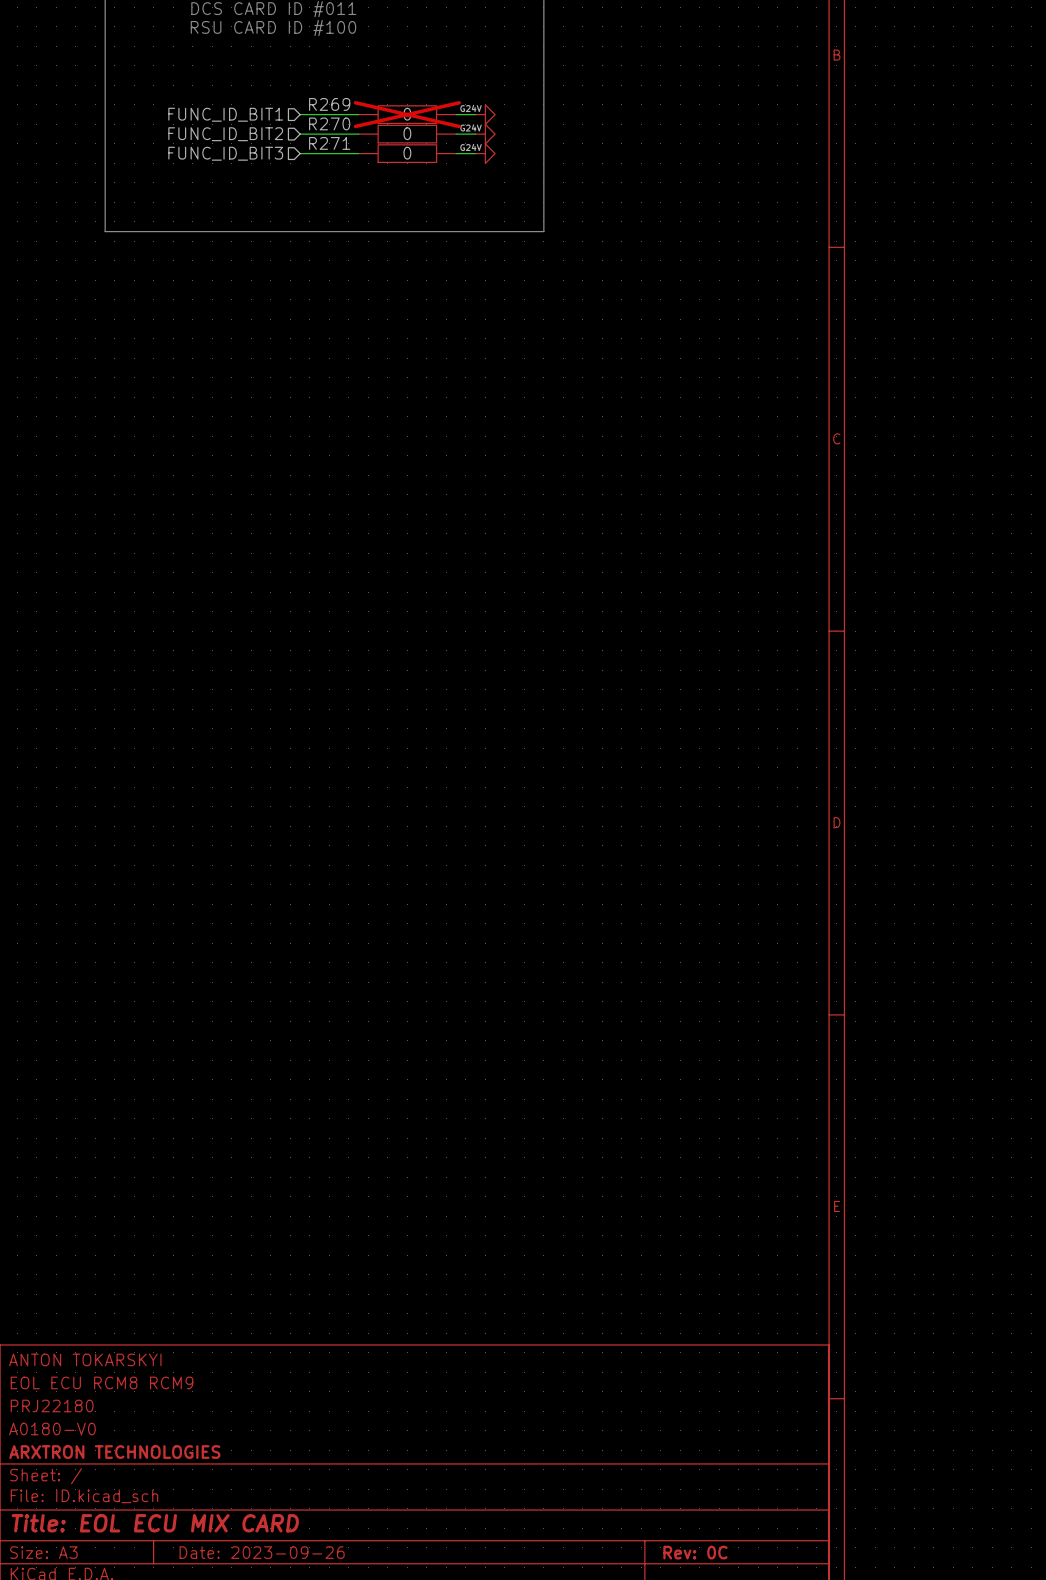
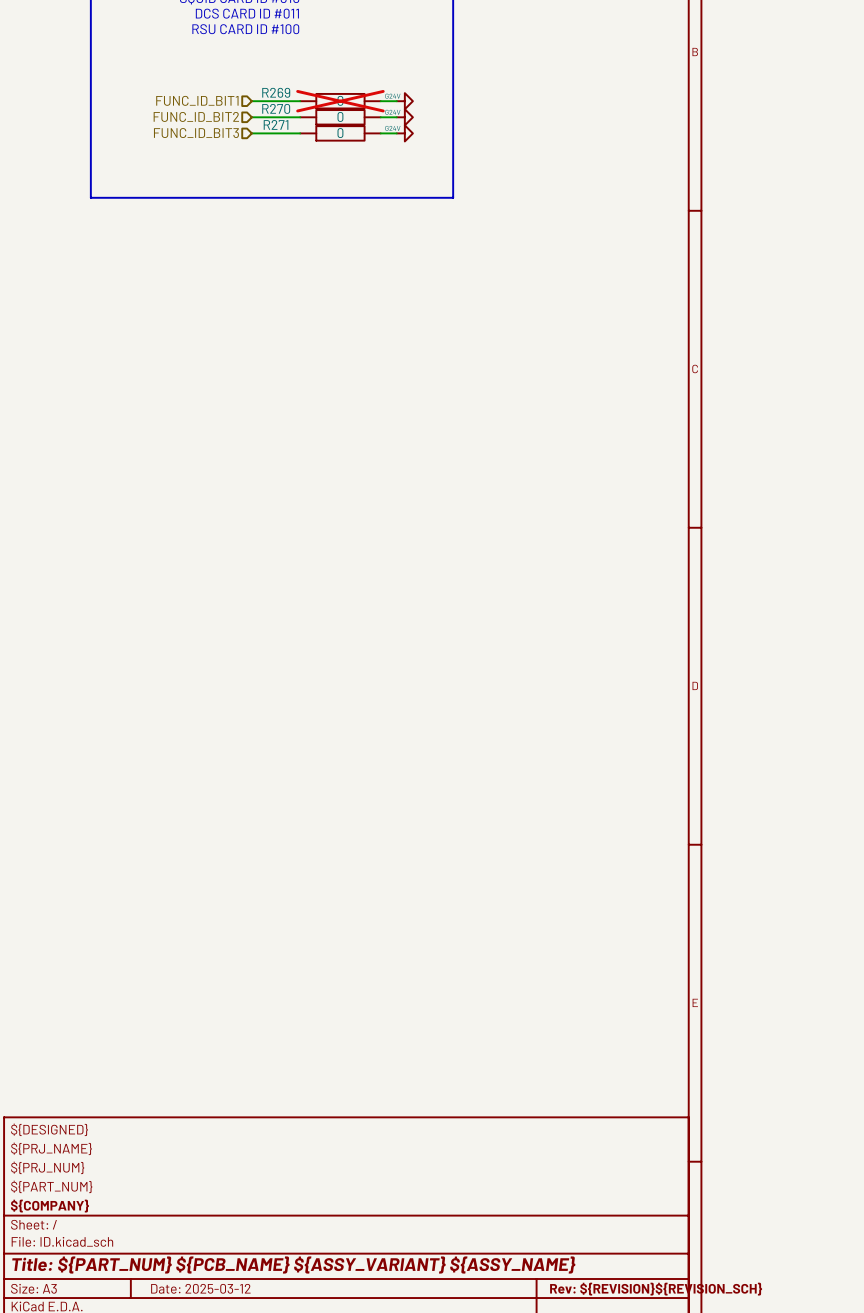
title block: ANTON TOKARSKYI (85, 1359) -> ${DESIGNED} (49, 1129)
title block: EOL ECU RCM8 RCM9 (102, 1382) -> ${PRJ_NAME} (51, 1148)
title block: PRJ22180 (52, 1405) -> ${PRJ_NUM} (47, 1167)
title block: A0180-V0 (52, 1429) -> ${PART_NUM} (51, 1186)
title block: ARXTRON TECHNOLOGIES (114, 1452) -> ${COMPANY} (49, 1206)
title block: Title: EOL ECU MIX CARD (155, 1523) -> Title: ${PART_NUM} ${PCB_NAME} ${ASSY_VARIANT} ${ASSY_NAME} (293, 1265)
title block: Date: 2023-09-26 (262, 1552) -> Date: 2025-03-12 (200, 1288)
title block: Rev: 0C (695, 1552) -> Rev: ${REVISION}${REVISION_SCH} (656, 1289)

